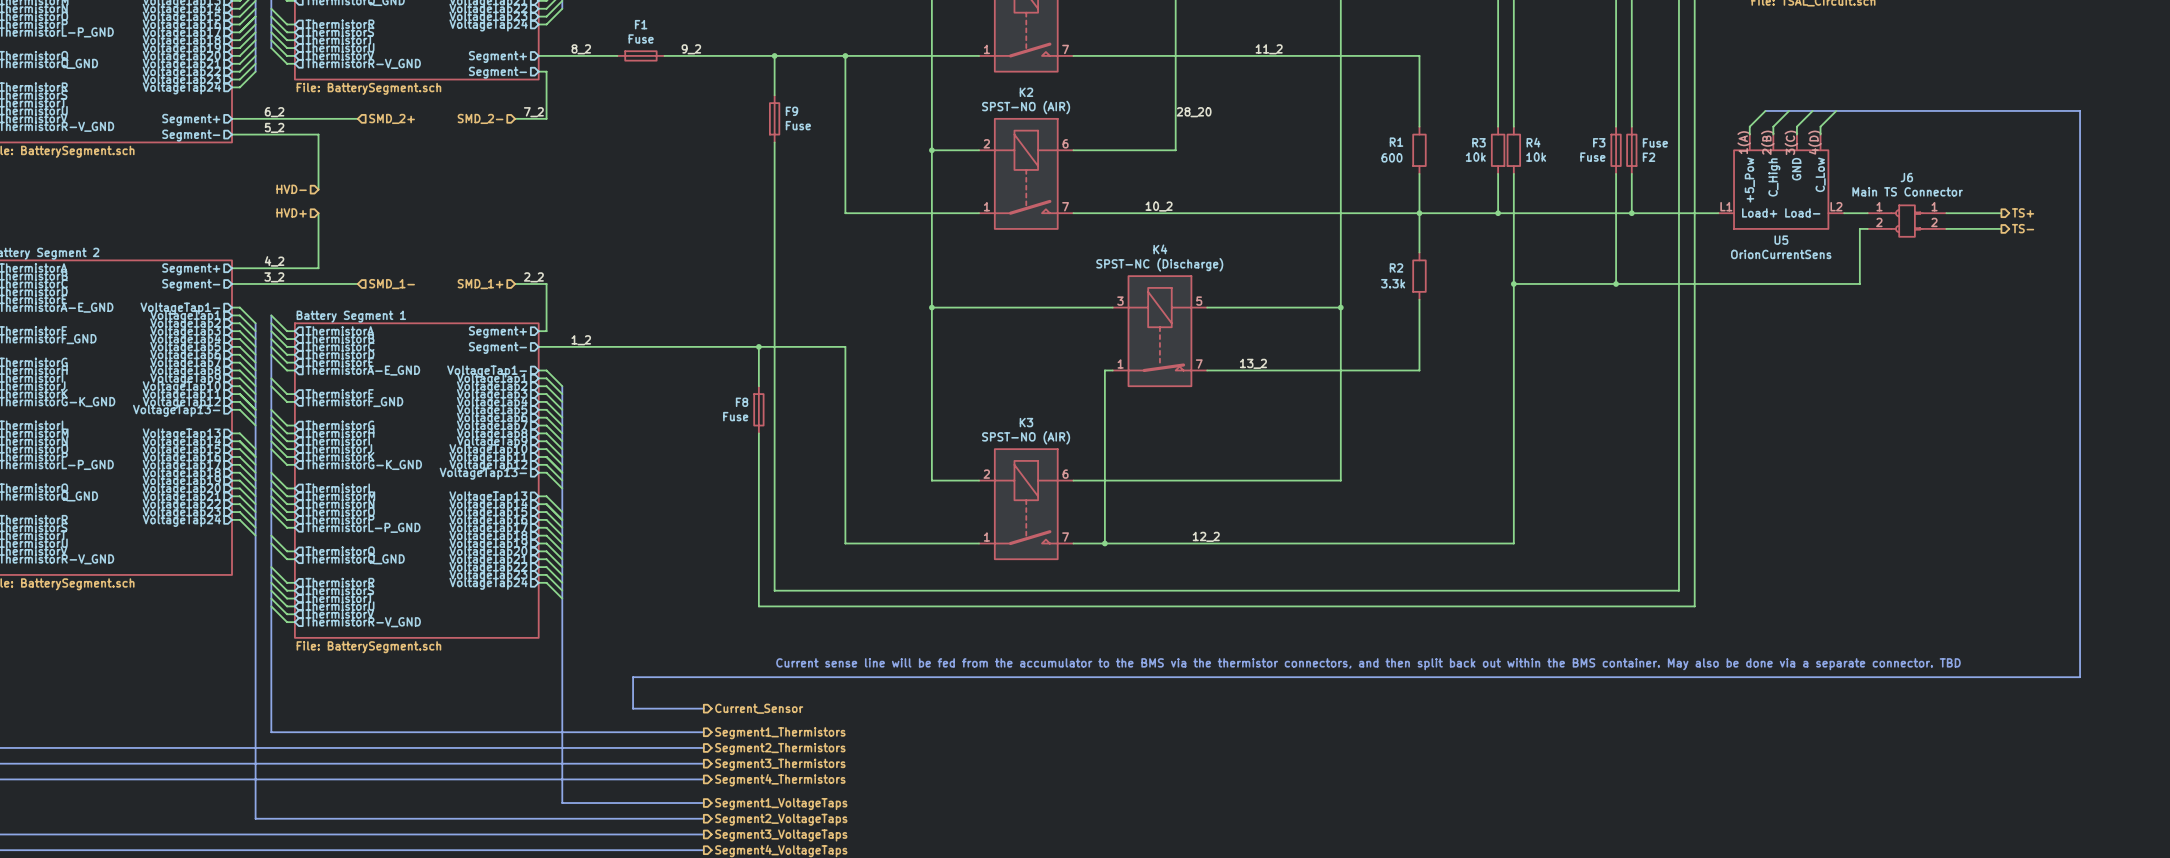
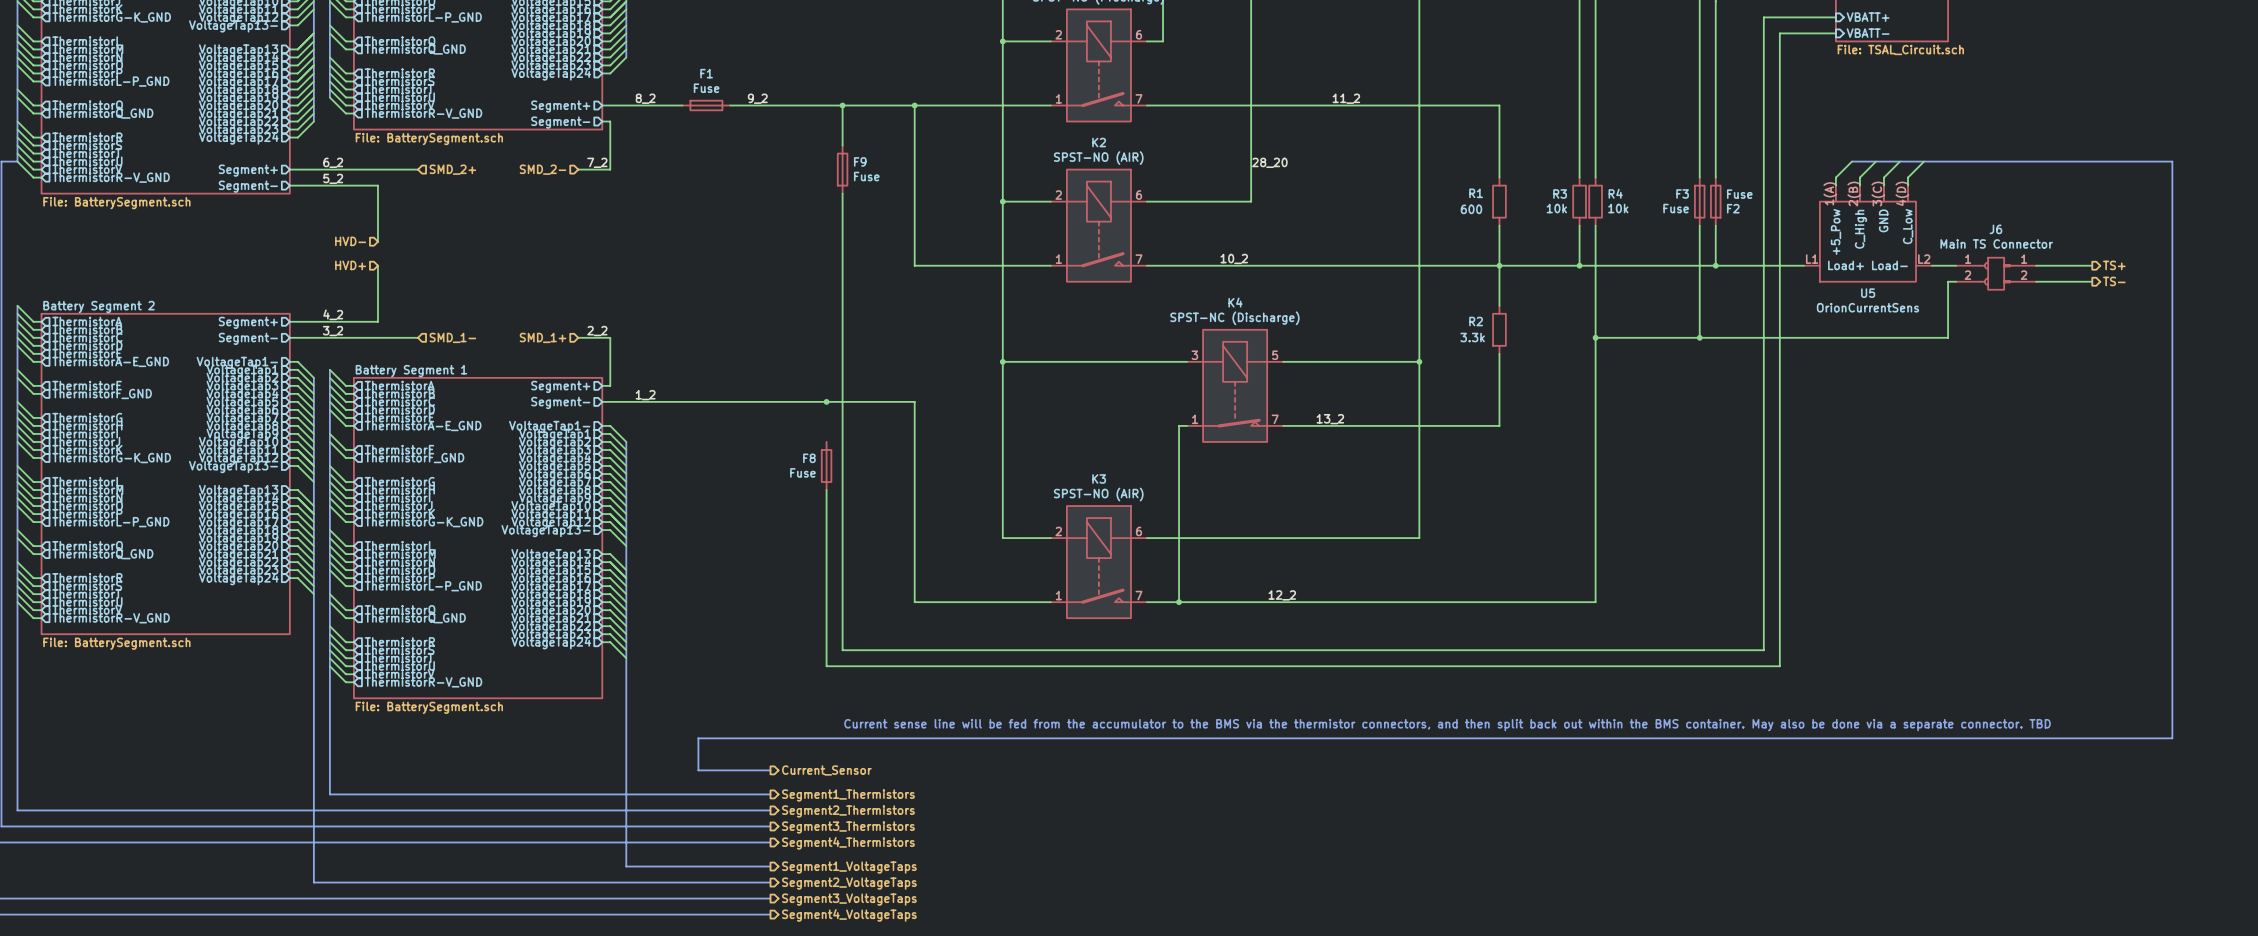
wire: (758, 346) (758, 386) -> none

